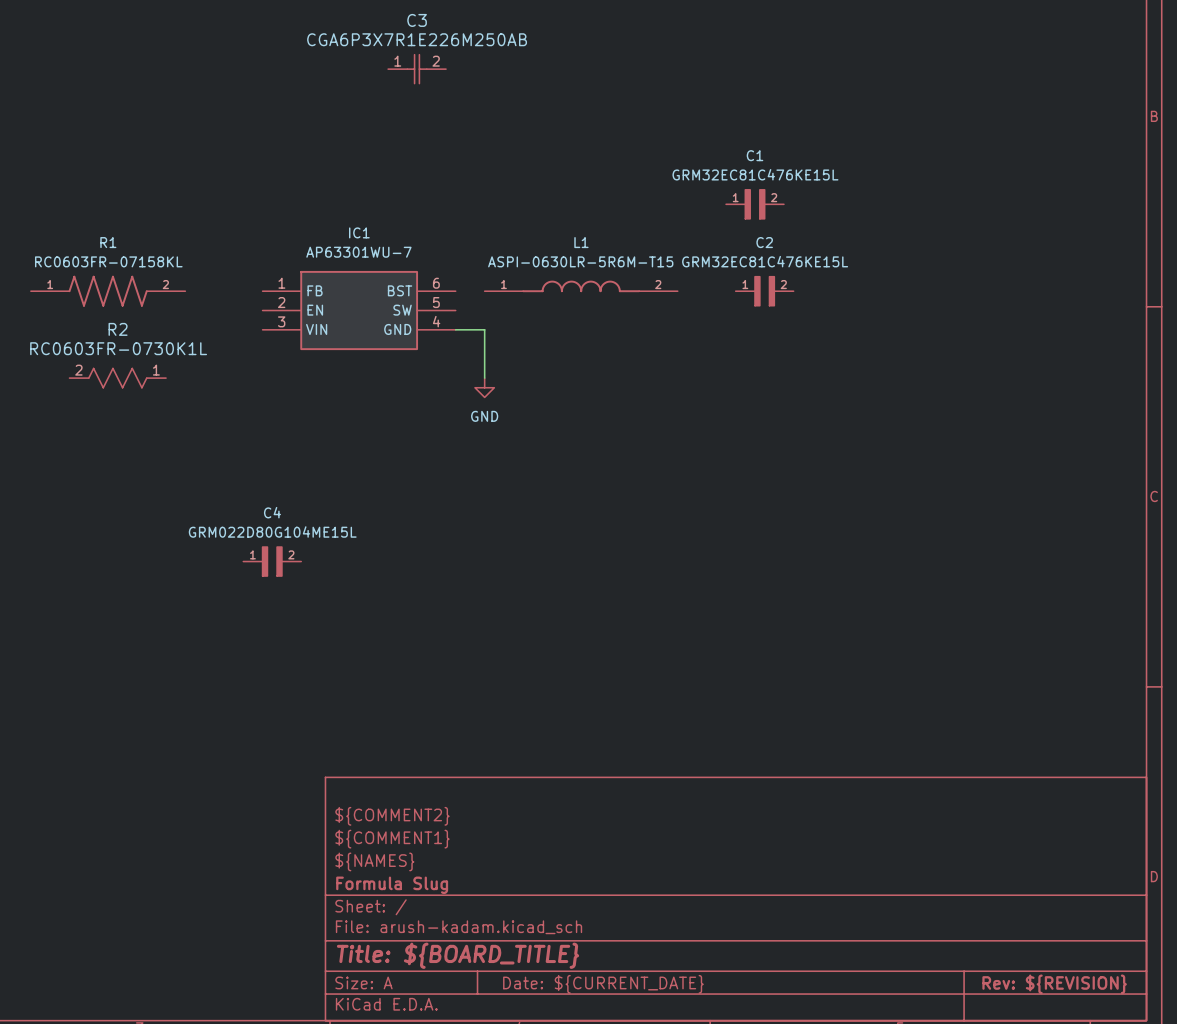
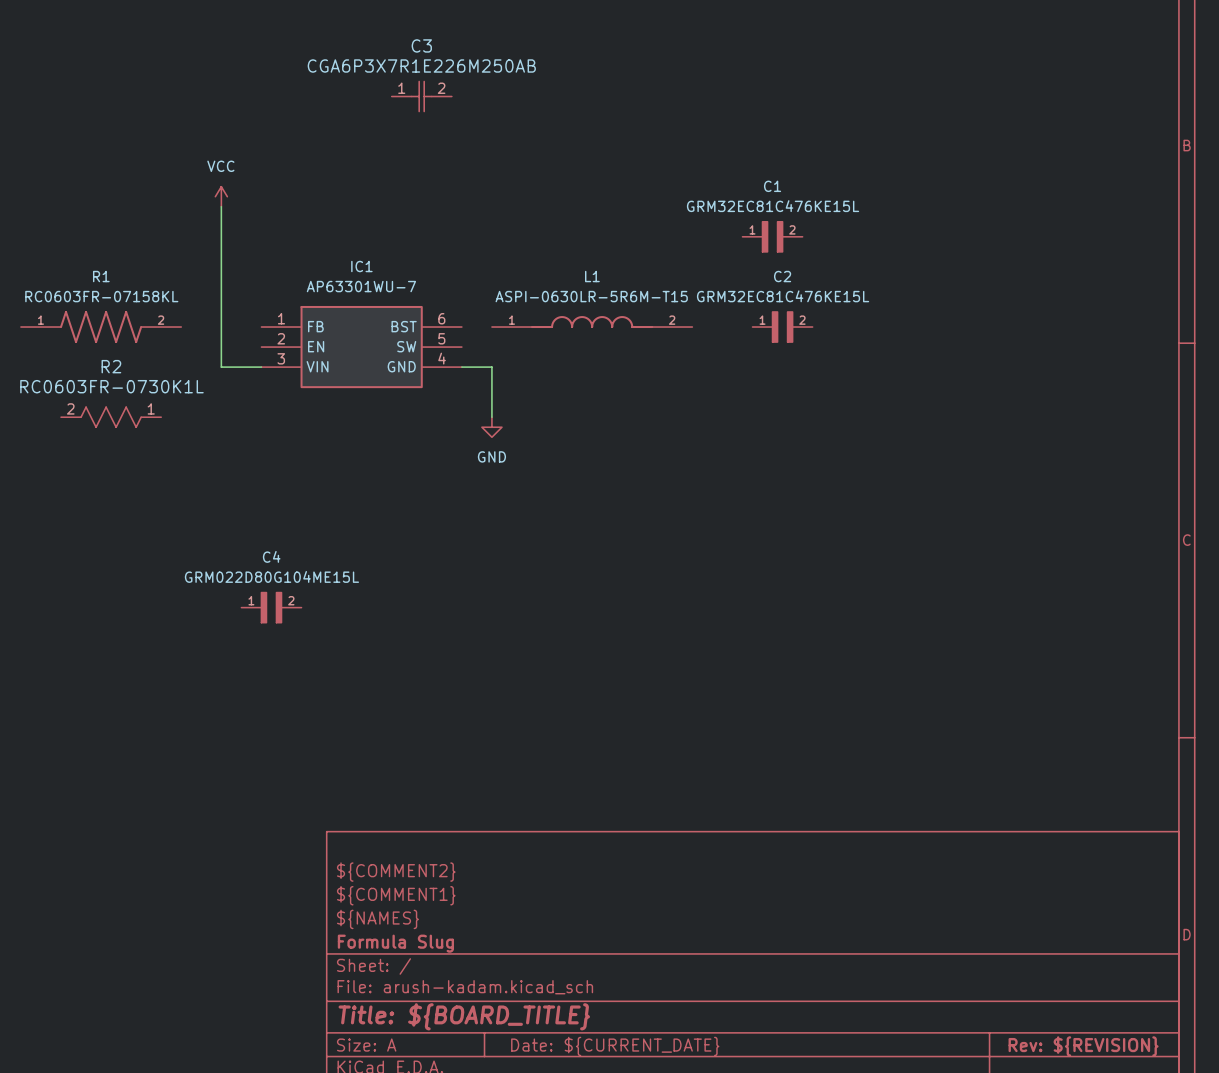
power symbol: none -> VCC (221, 196)
wire: none -> (221, 206) (221, 367) (261, 367)

